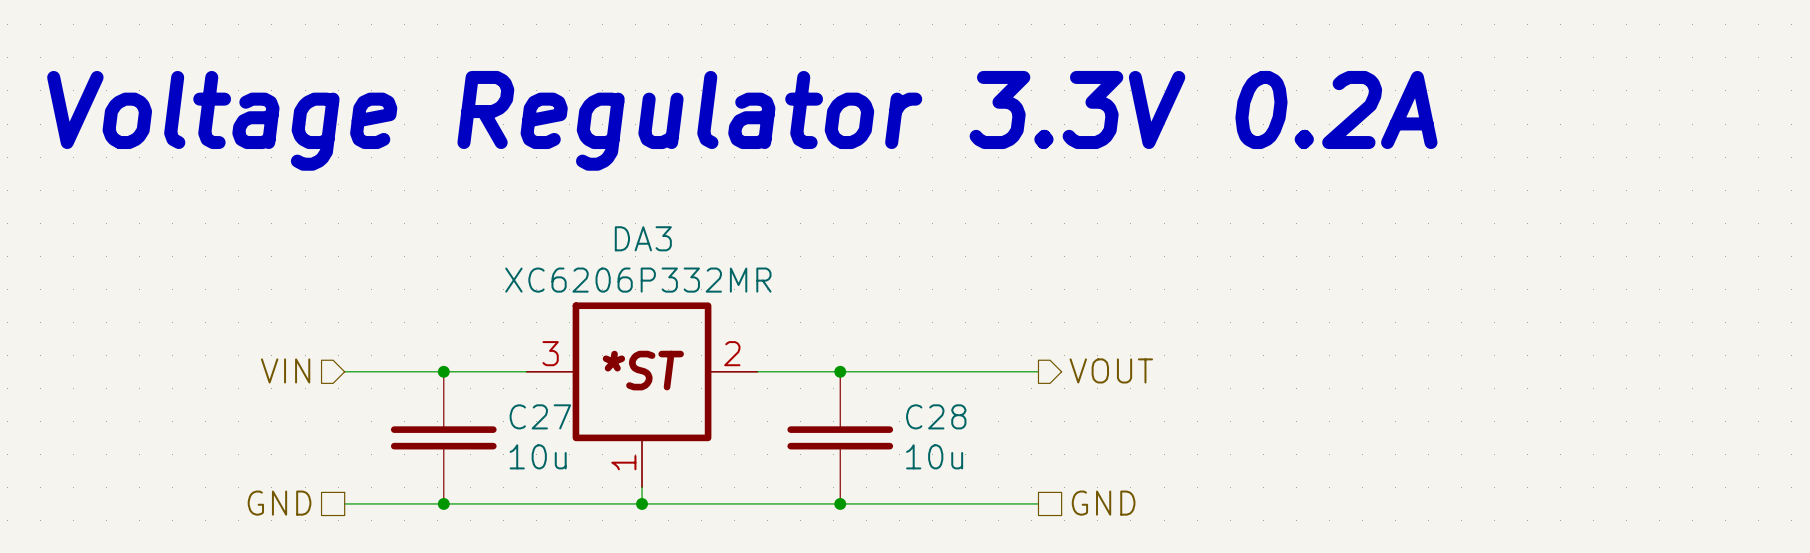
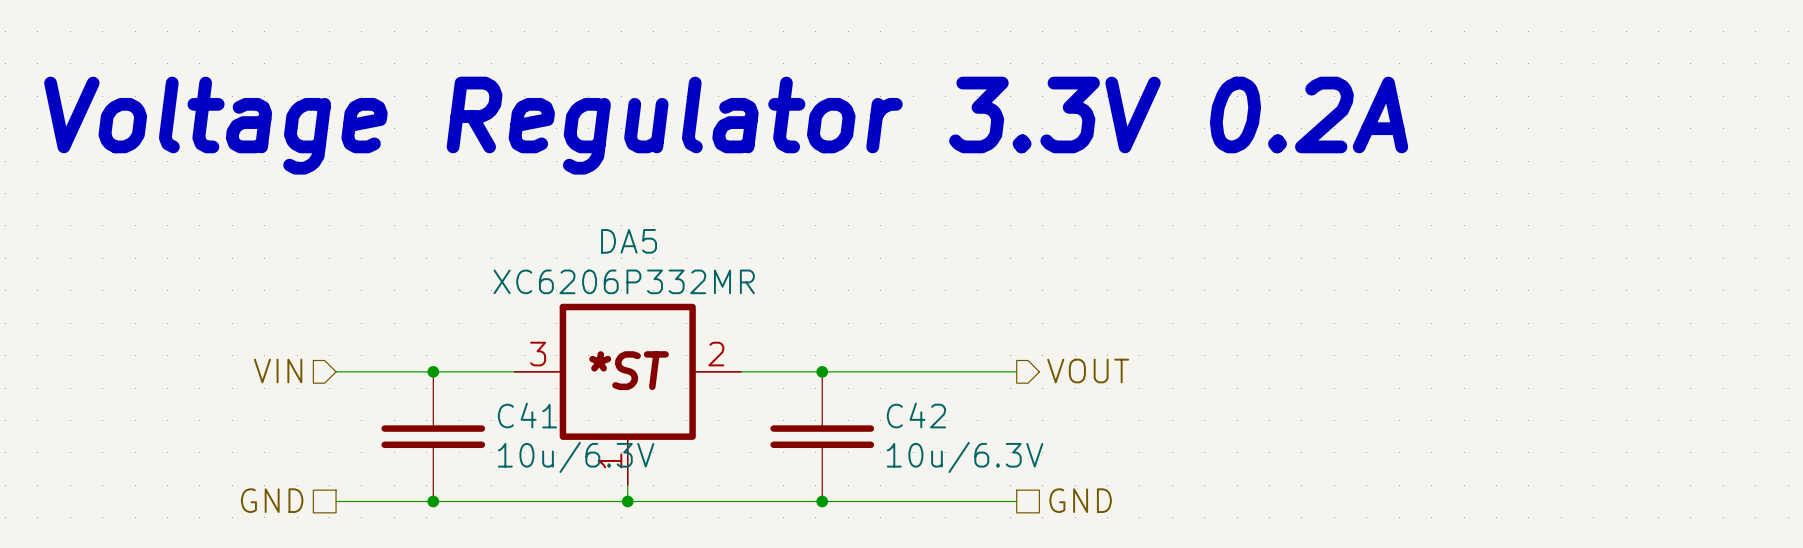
DA3 name: DA3 (643, 238) -> DA5 (629, 241)
C27 name: C27 (540, 416) -> C41 (527, 415)
C28 name: C28 (936, 416) -> C42 (916, 415)
C27 value: 10u (538, 456) -> 10u/6.3V (576, 457)
C28 value: 10u (934, 456) -> 10u/6.3V (965, 457)

